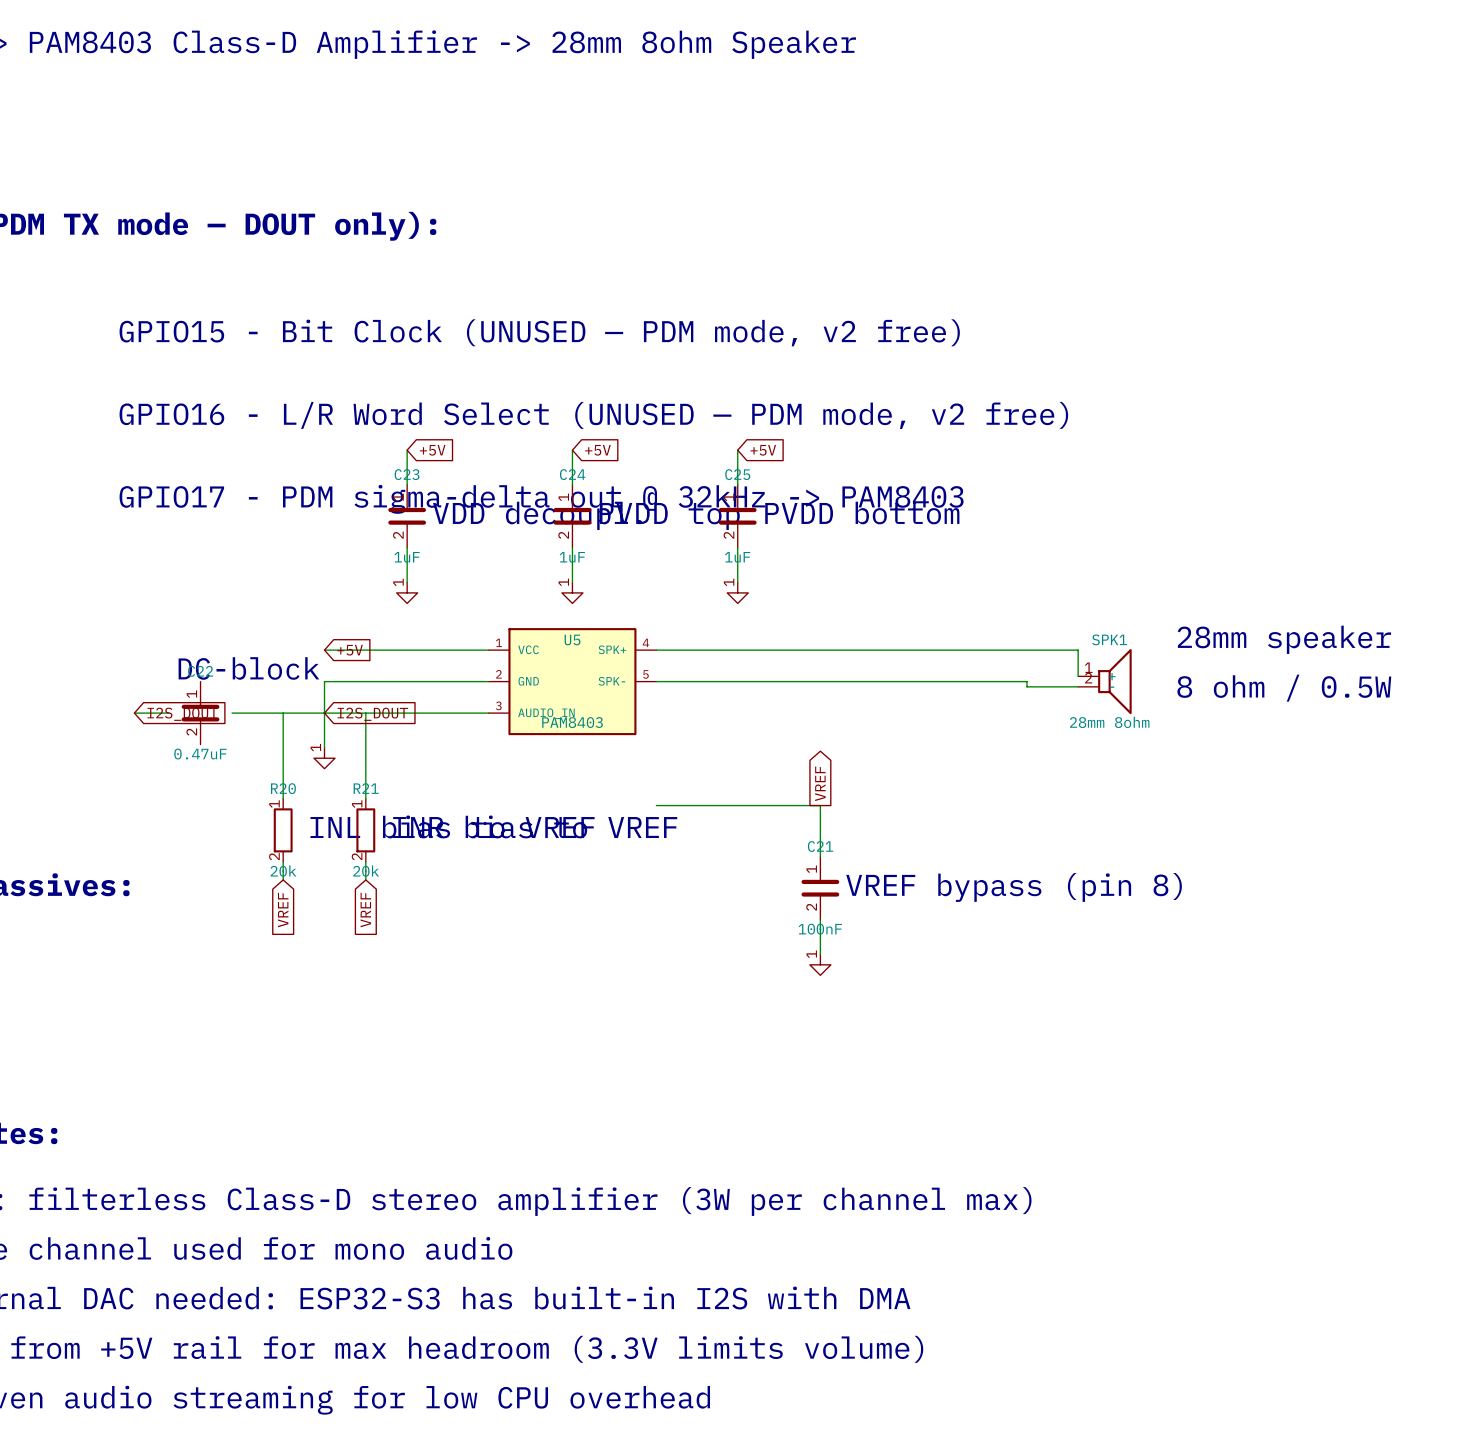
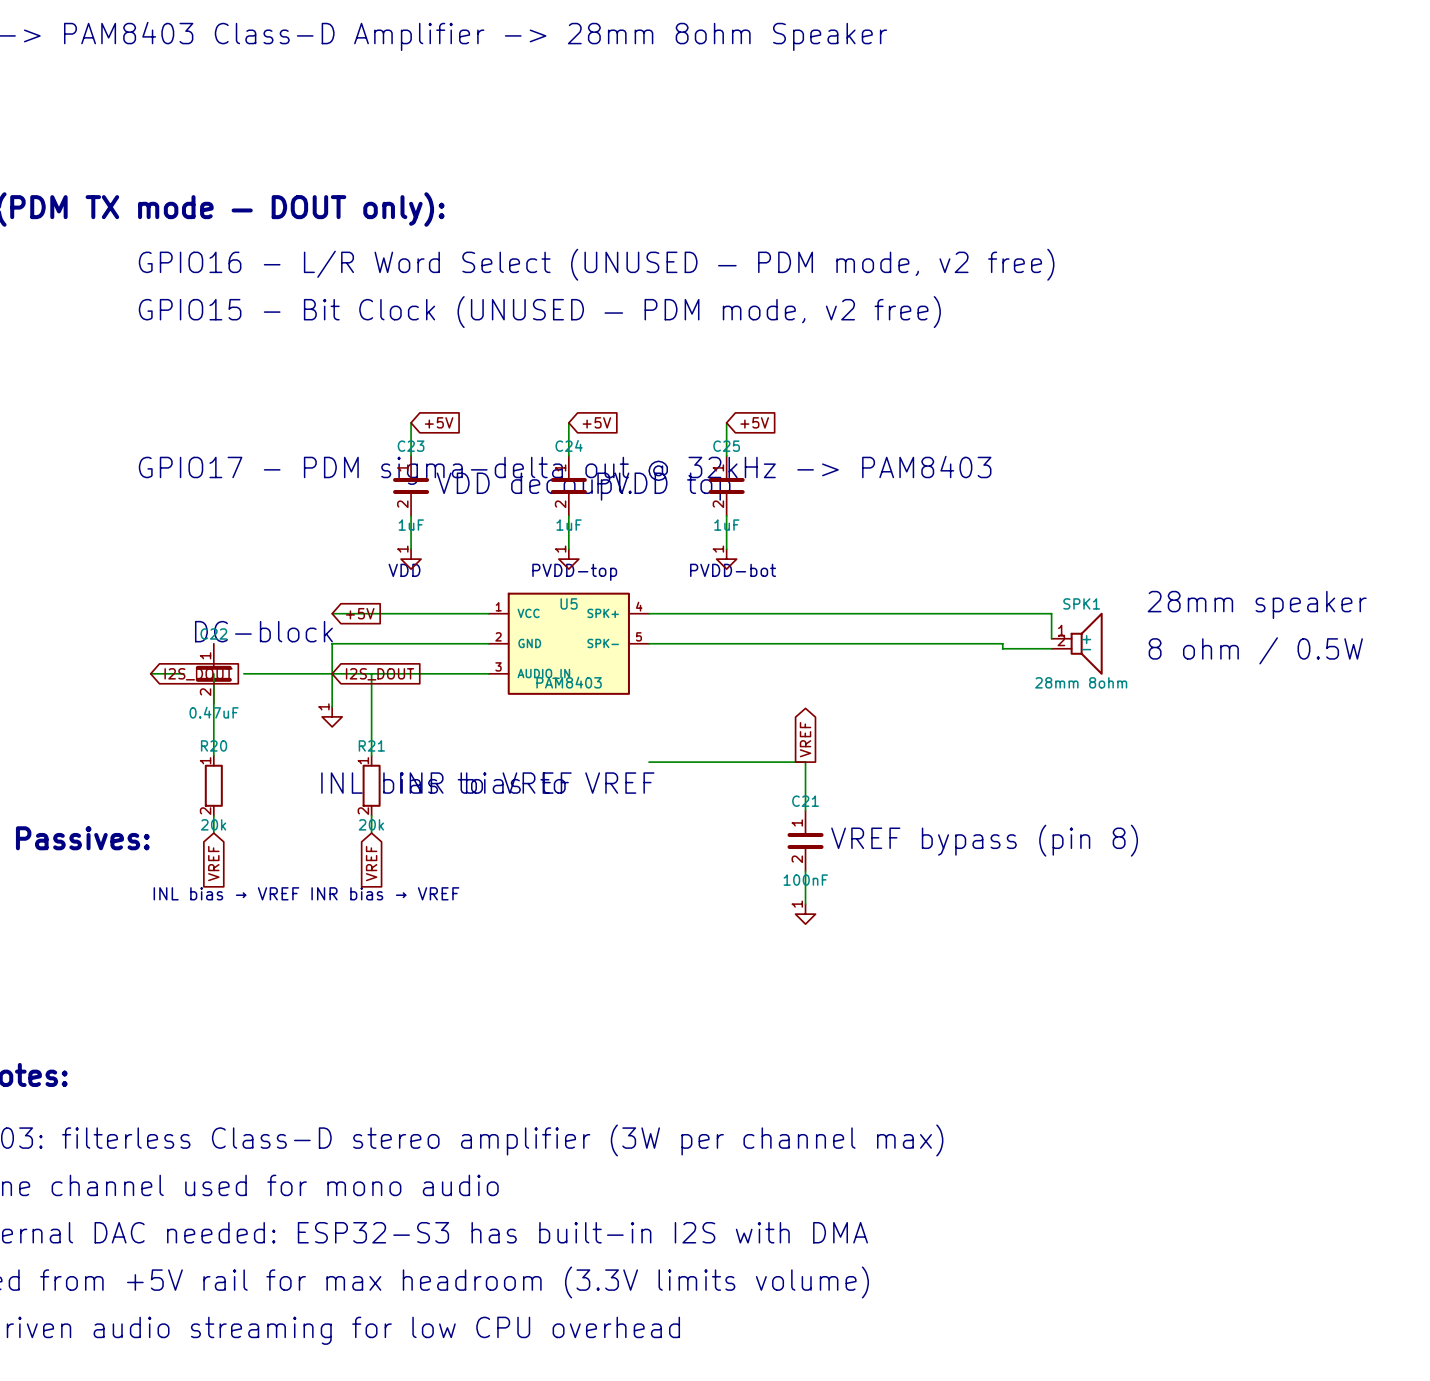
text position: GPIO16 - L/R Word Select (UNUSED — PDM mode, v2 free) (593, 415) -> GPIO16 - L/R Word Select (UNUSED — PDM mode, v2 free) (596, 264)
text: PVDD bottom (862, 513) -> none
text: none -> VDD (404, 570)
text: none -> PVDD-bot (733, 570)
text: none -> PVDD-top (574, 572)
wire: (283, 713) (283, 798) -> (213, 673) (213, 755)
R20 position: (283, 830) -> (213, 785)
wire: (283, 861) (283, 879) -> (213, 815) (213, 833)
global label position: VREF (283, 910) -> VREF (213, 863)
text: none -> INL bias → VREF (226, 893)
text: none -> INR bias → VREF (385, 893)

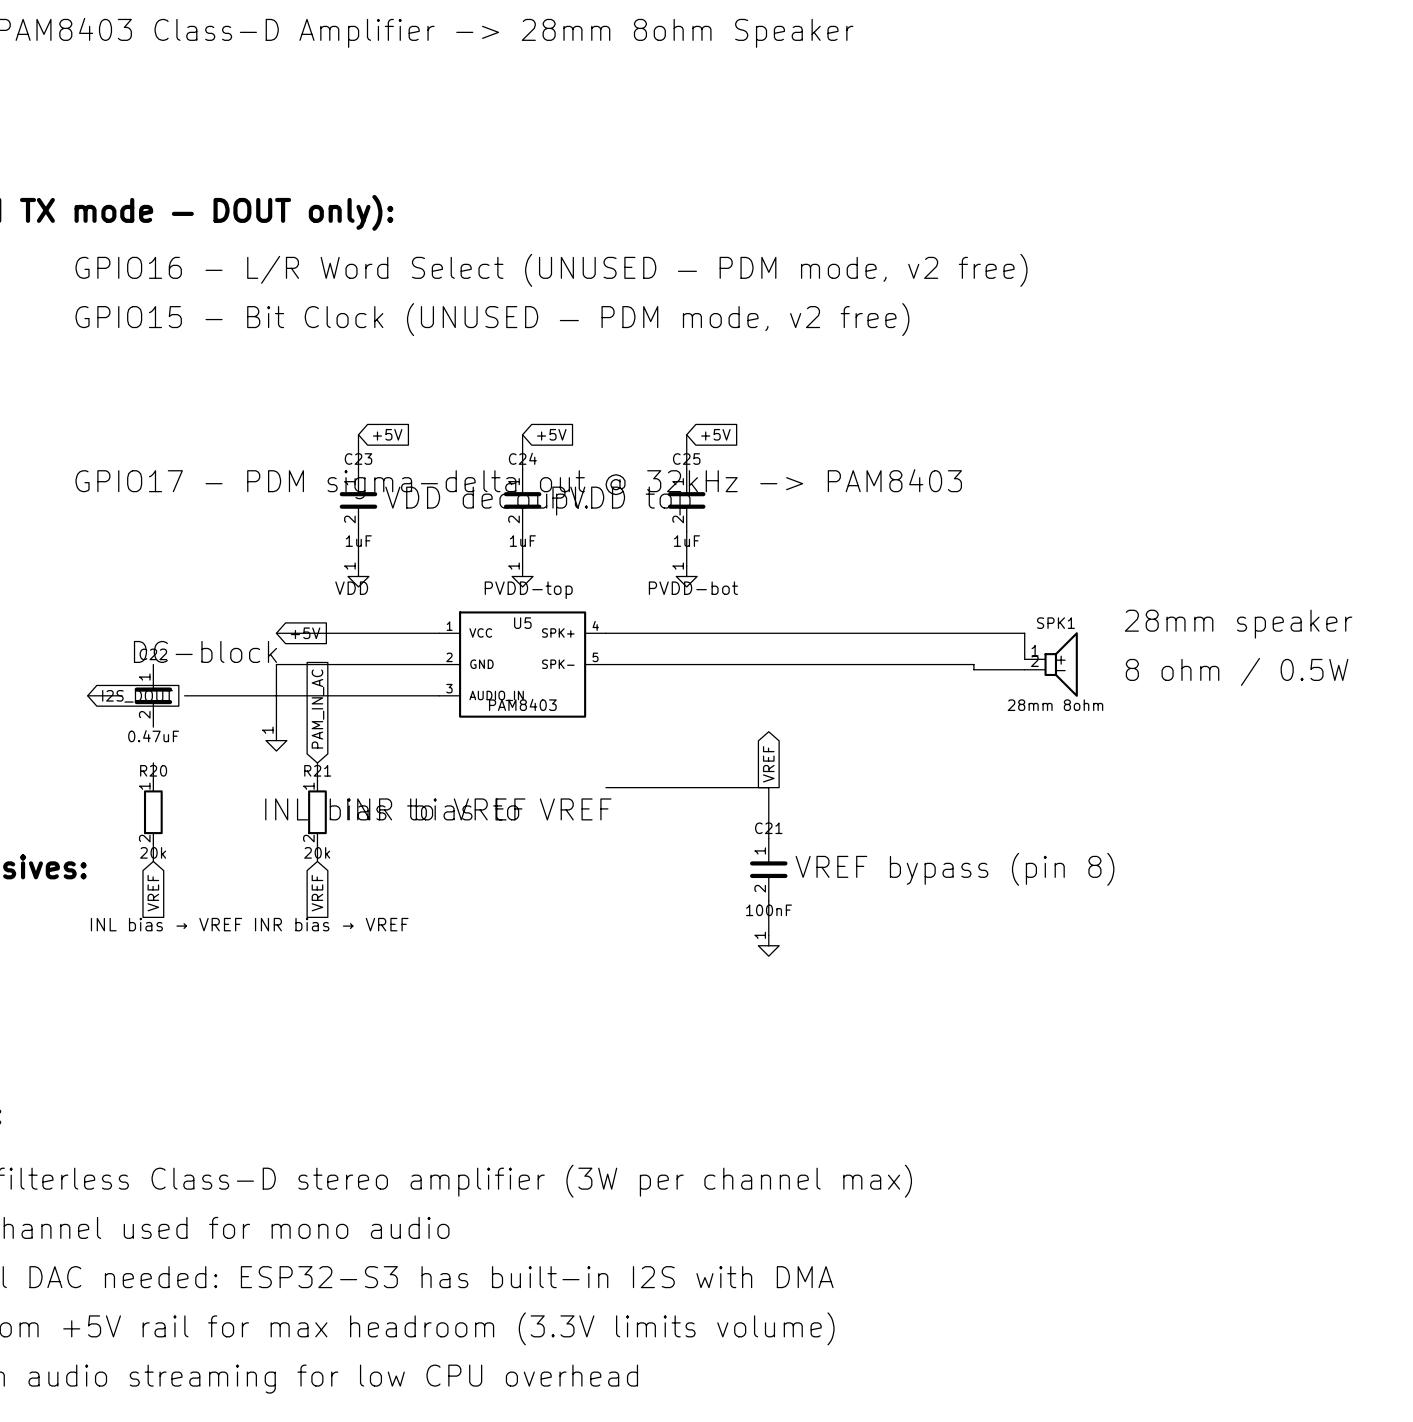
wire: (213, 673) (213, 738) -> none
wire: (371, 673) (371, 738) -> none
global label: I2S_DOUT (380, 674) -> none
global label: none -> PAM_IN_AC (317, 709)

